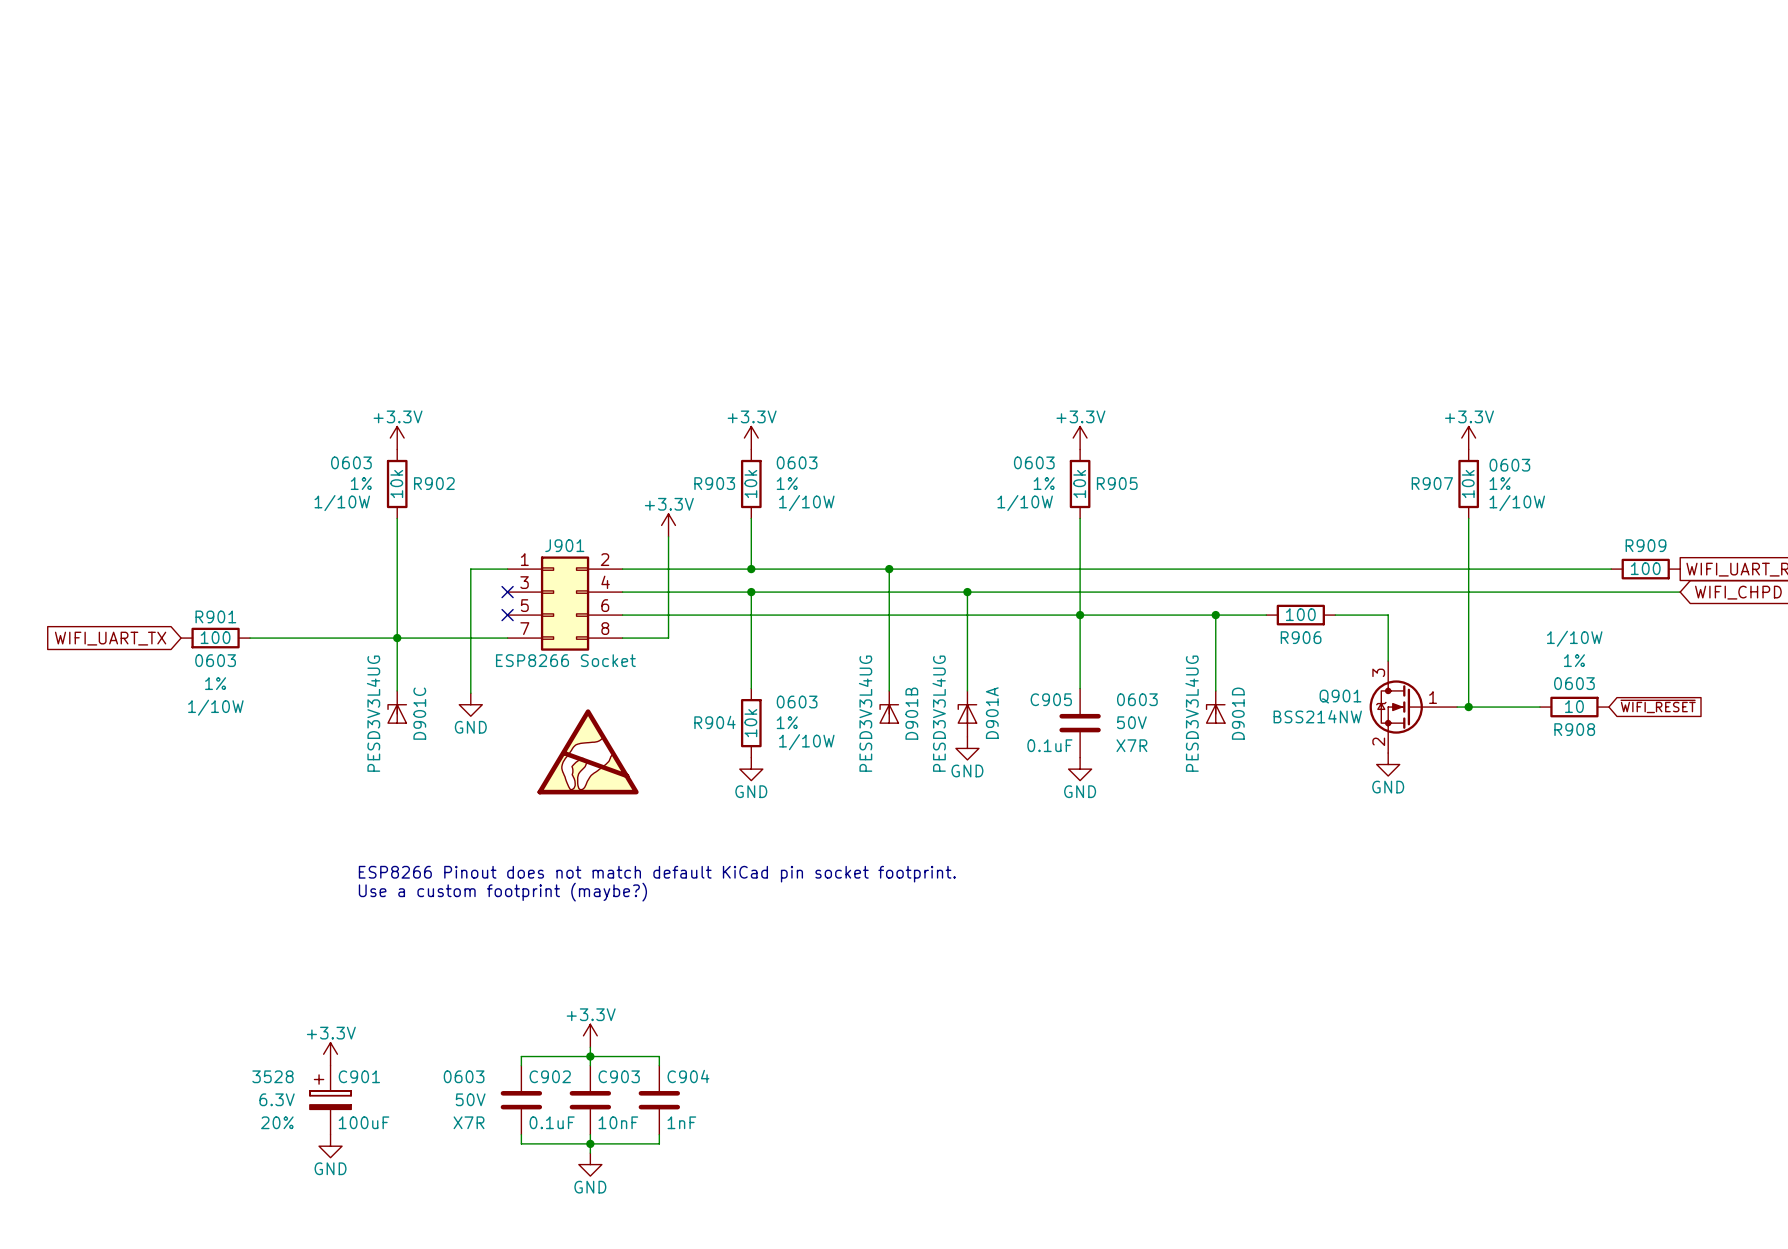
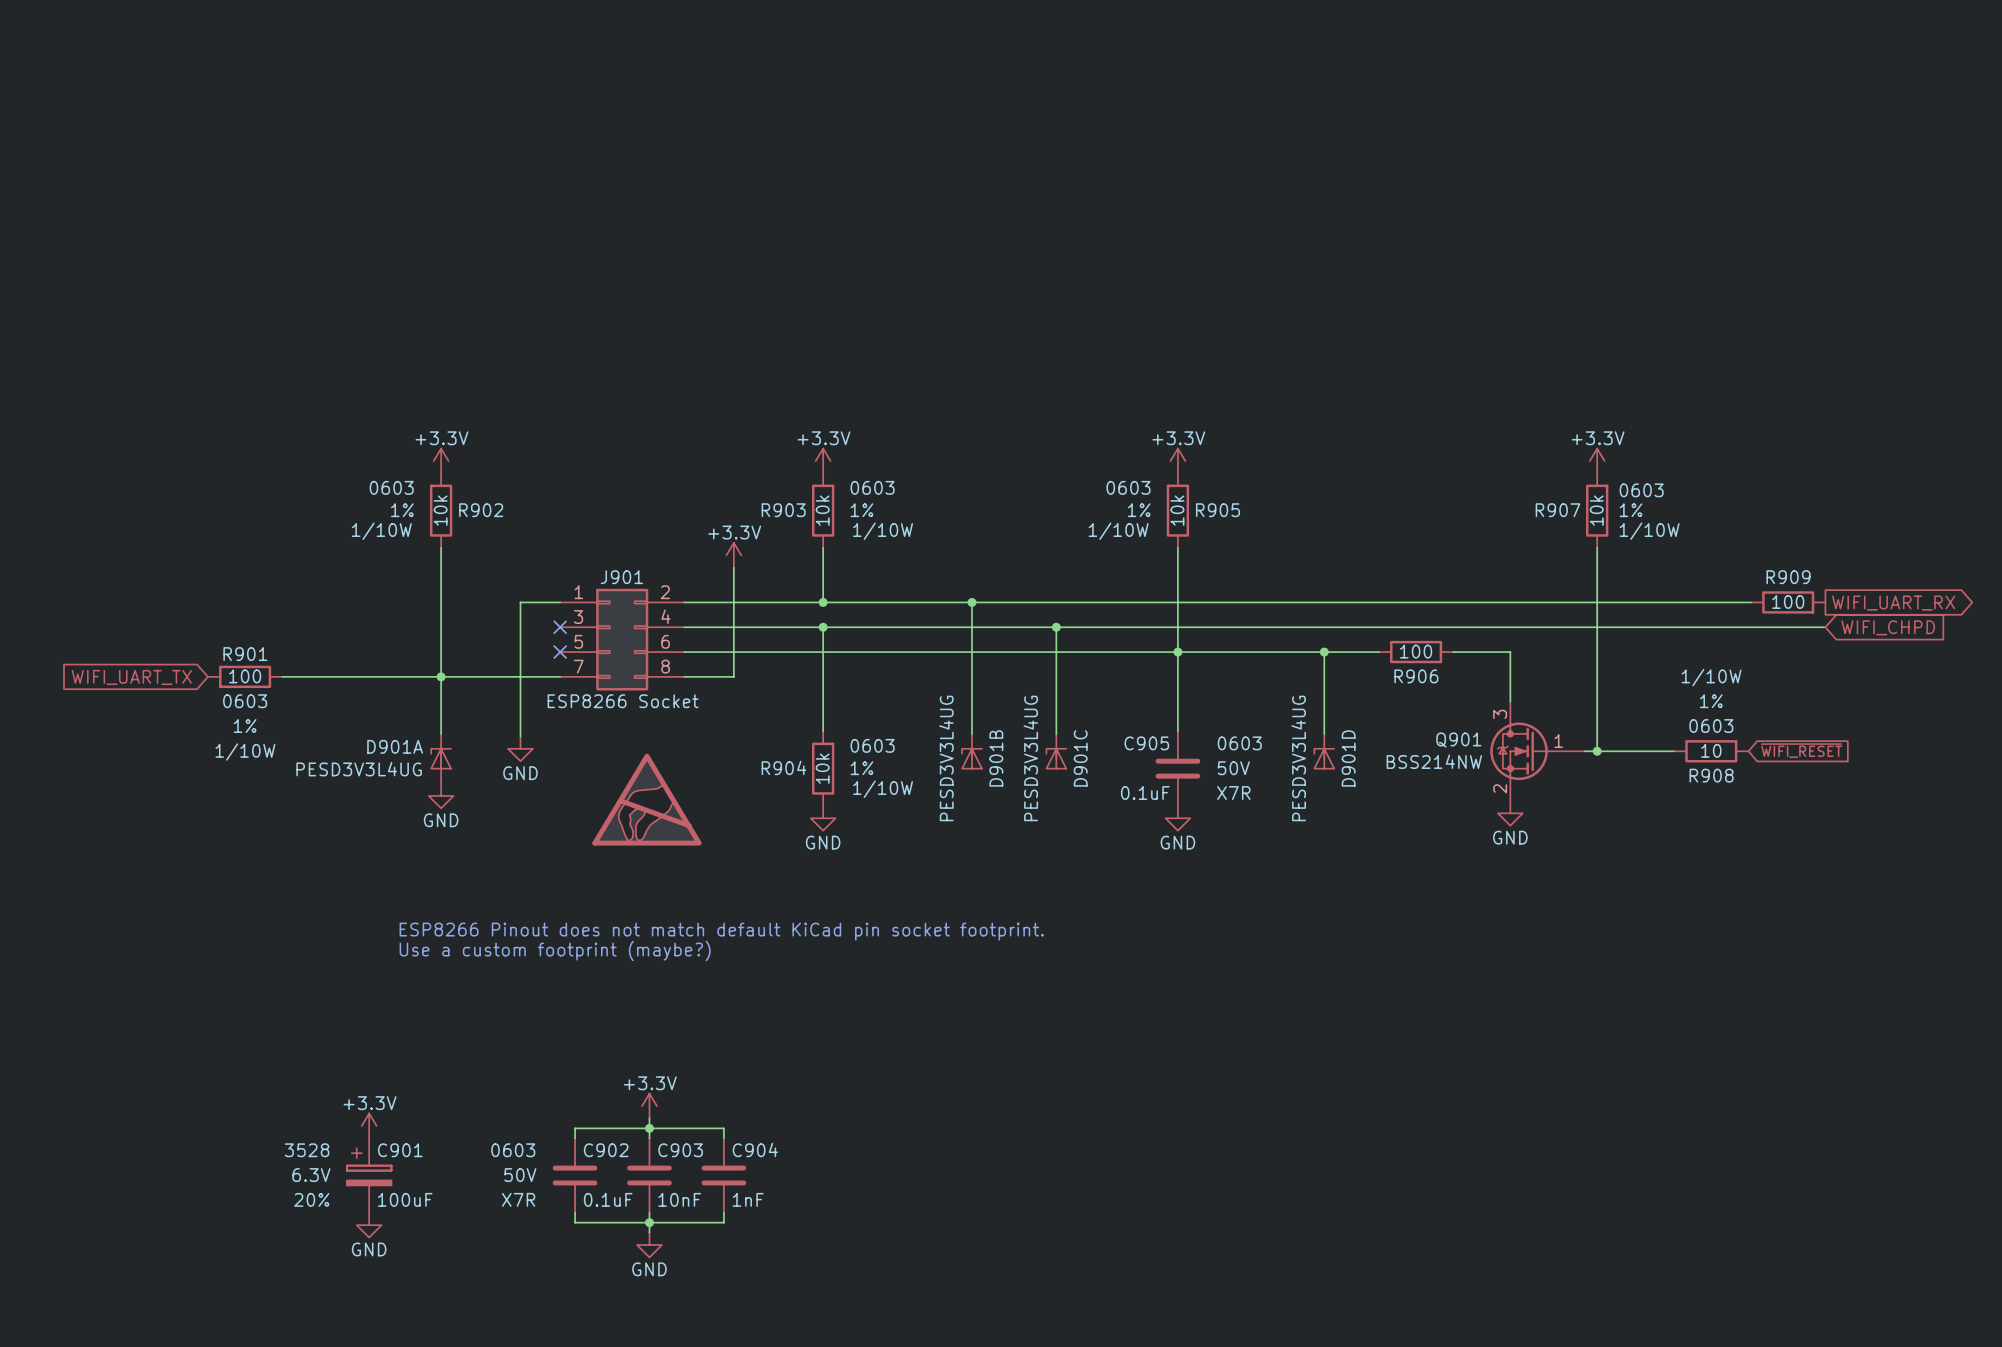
D901C position: (397, 707) -> (1056, 751)
D901A value rotation: 0° (939, 713) -> 90° clockwise (359, 769)
D901A position: (967, 713) -> (441, 758)
D901A name rotation: 0° (992, 713) -> 90° clockwise (395, 746)
D901A name position: D901A (992, 713) -> D901A (395, 746)
power symbol: none -> GND (441, 795)
power symbol: GND (967, 748) -> none

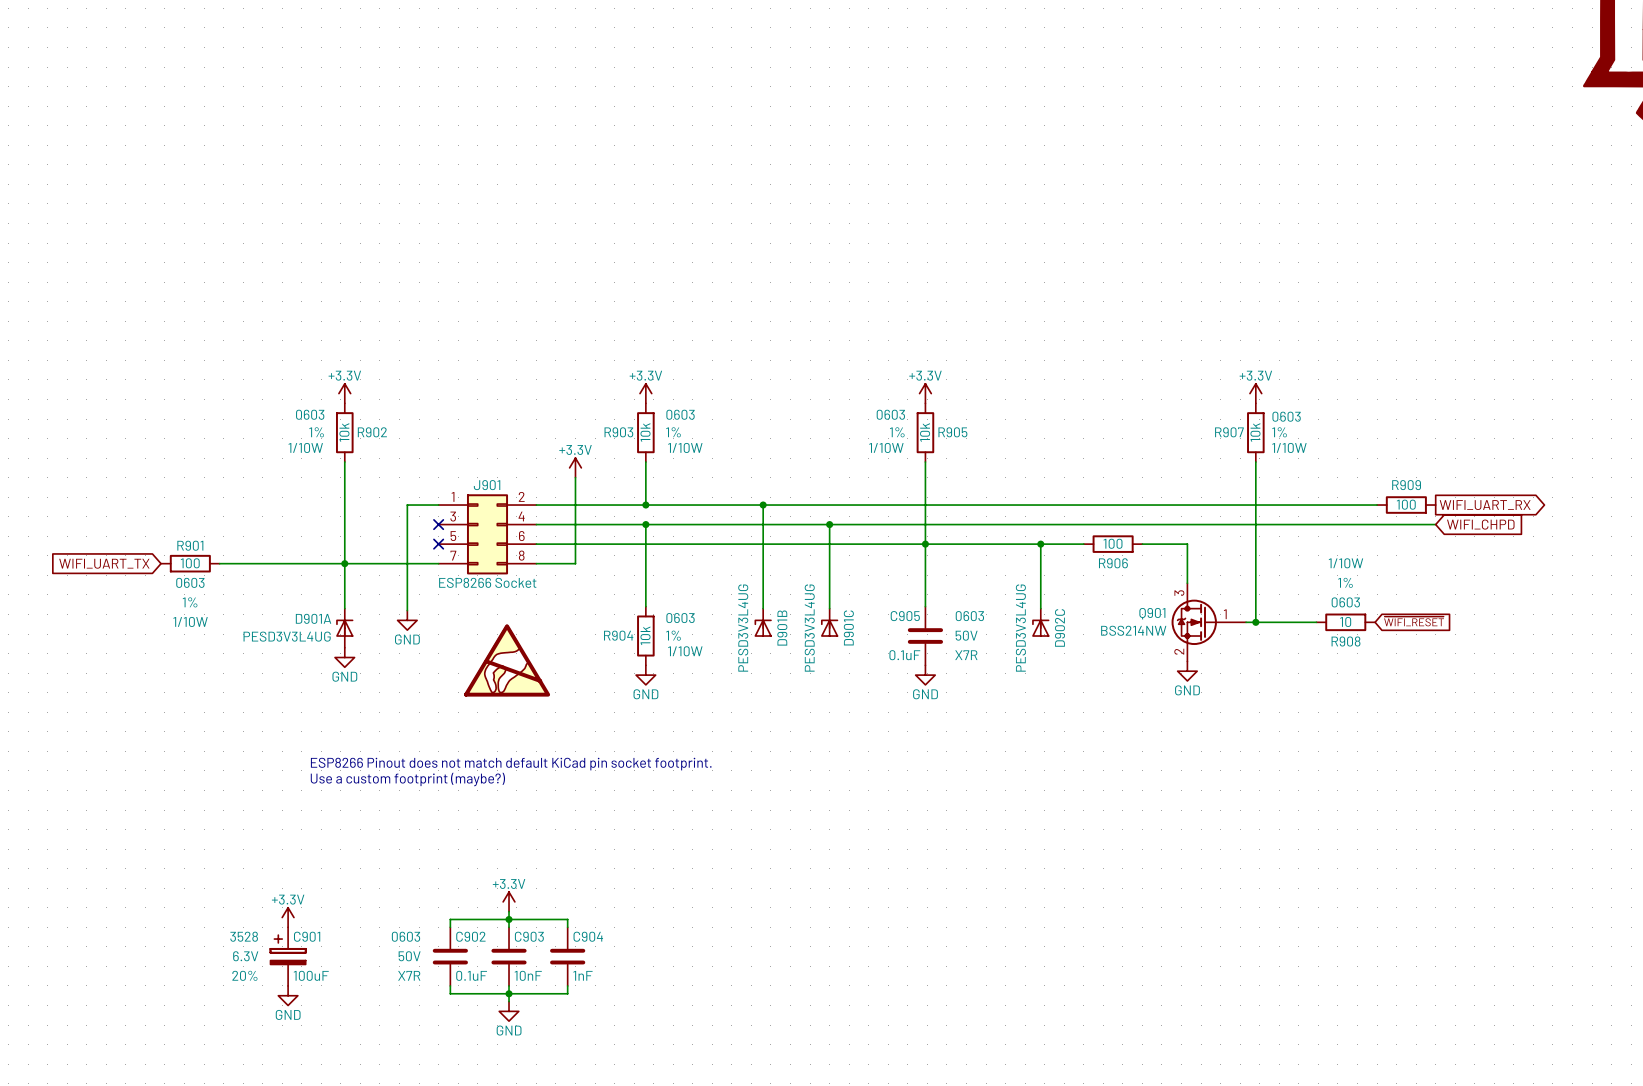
D901D name: D901D (1348, 758) -> D902C (1059, 627)

